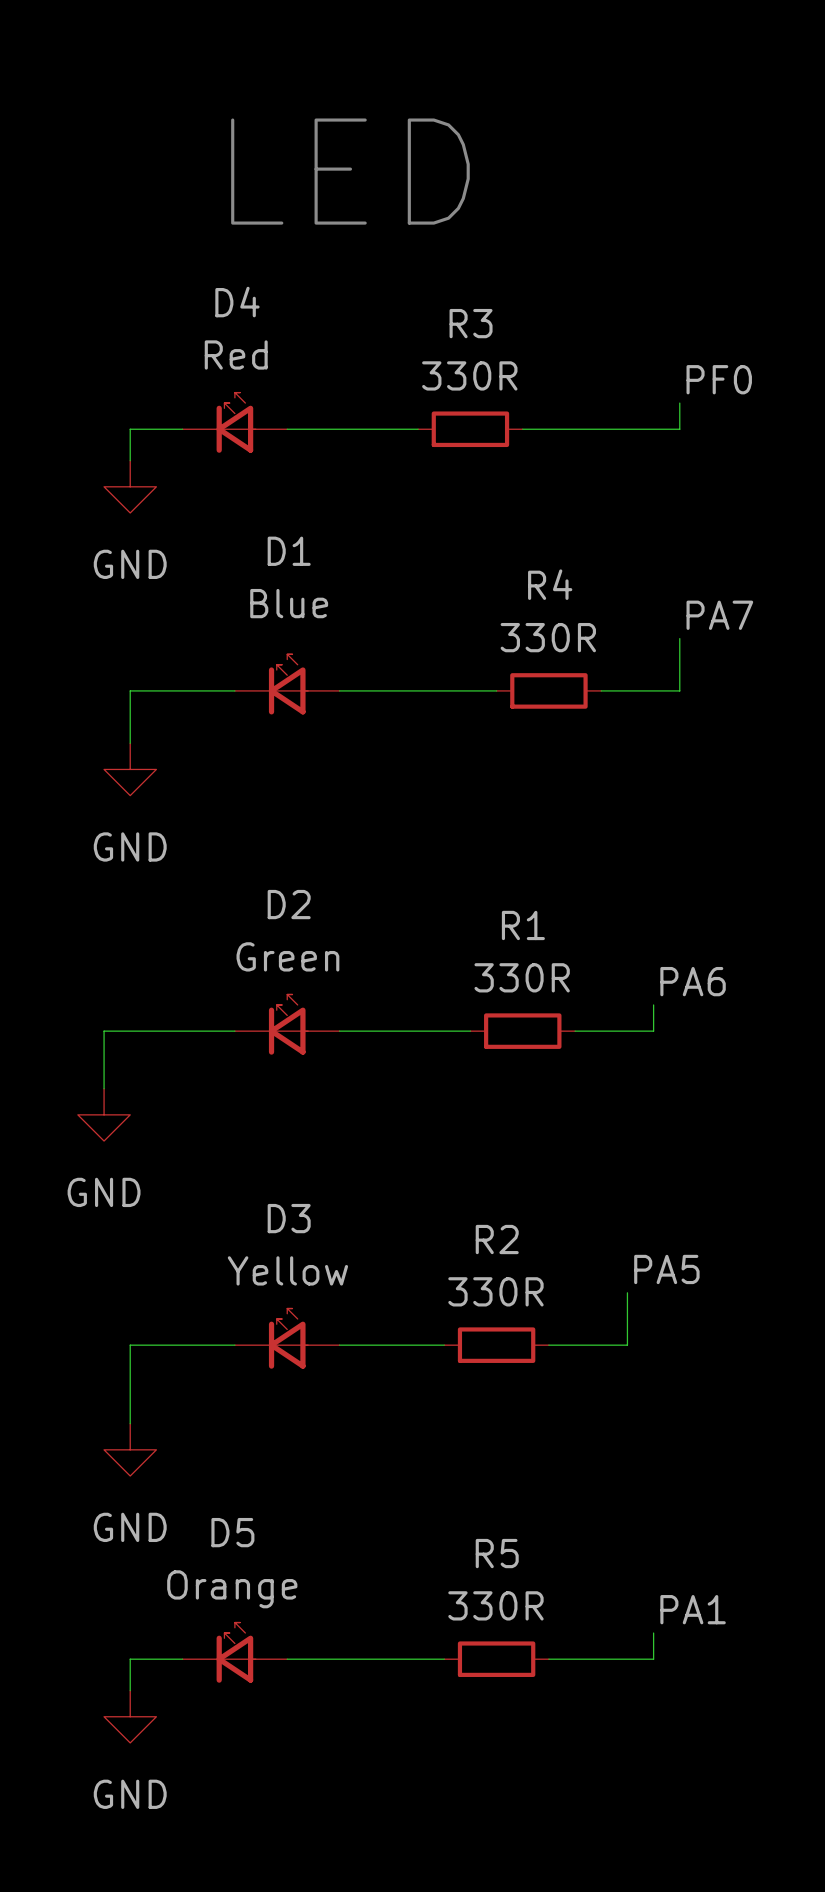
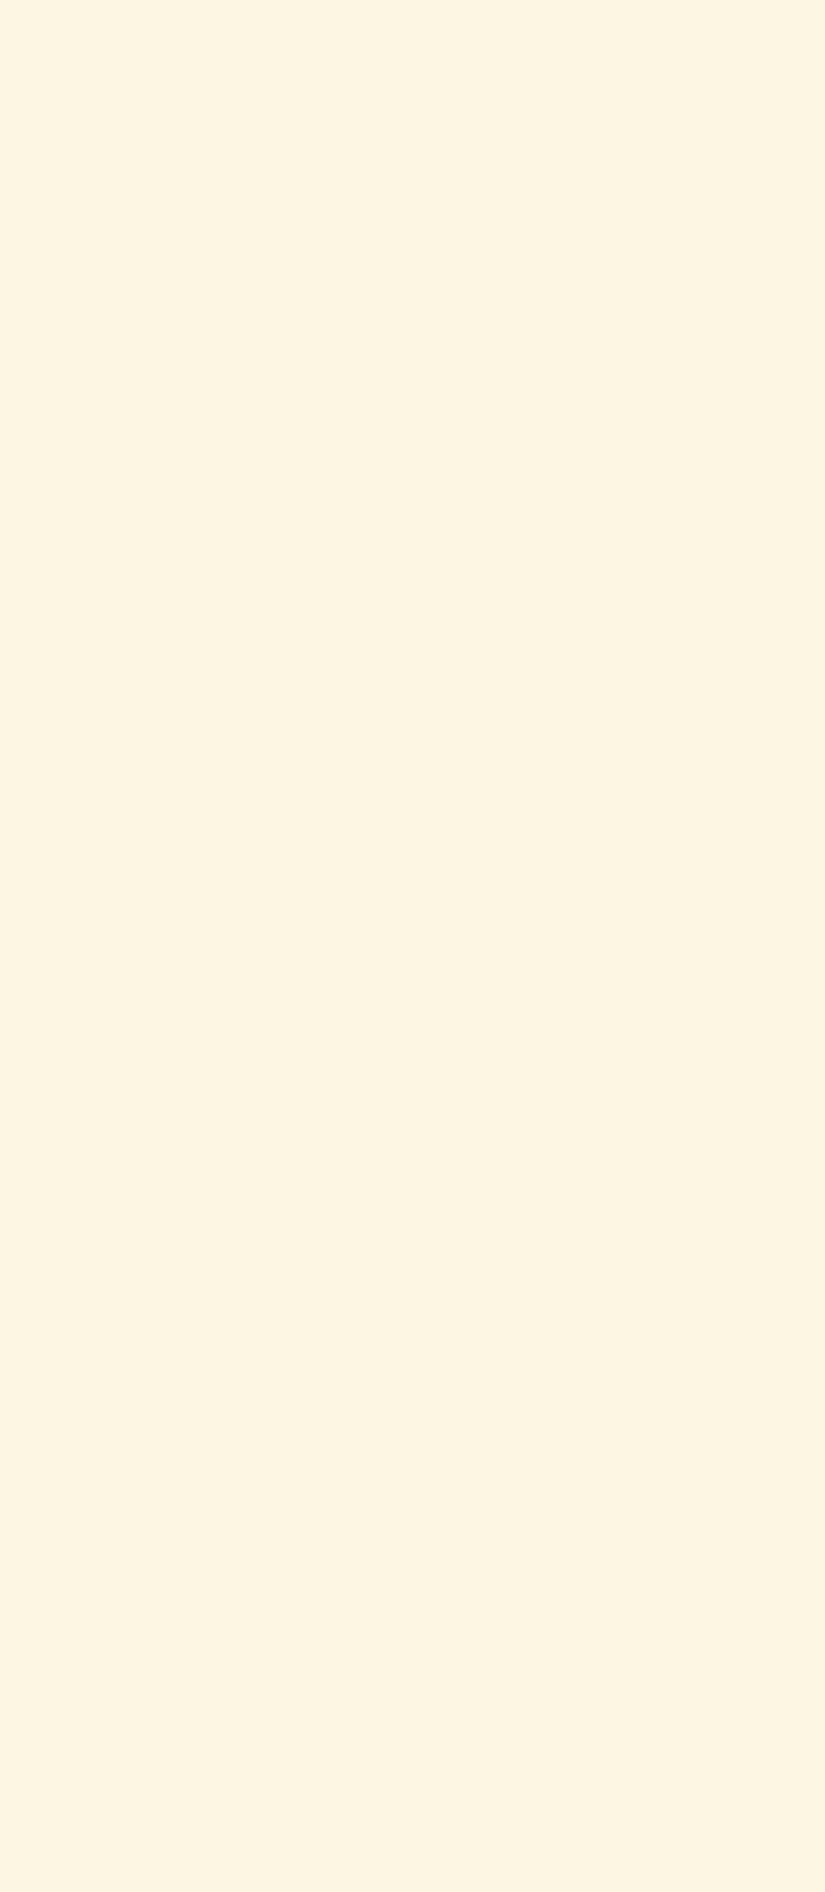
text: LED (350, 171) -> none
label: PF0 (719, 379) -> none
wire: (679, 403) (679, 429) (522, 429) -> none
D4: Red (234, 422) -> none
wire: (182, 429) (130, 429) (130, 460) -> none
wire: (287, 429) (418, 429) -> none
R3: 330R (470, 429) -> none
power symbol: GND (130, 486) -> none
label: PA7 (719, 615) -> none
wire: (679, 638) (679, 690) (601, 690) -> none
D1: Blue (287, 684) -> none
wire: (234, 690) (130, 690) (130, 743) -> none
wire: (339, 690) (496, 690) -> none
R4: 330R (548, 690) -> none
power symbol: GND (130, 769) -> none
label: PA6 (693, 981) -> none
wire: (653, 1004) (653, 1031) (575, 1031) -> none
D2: Green (287, 1024) -> none
wire: (234, 1031) (104, 1031) (104, 1088) -> none
wire: (339, 1031) (470, 1031) -> none
R1: 330R (522, 1031) -> none
power symbol: GND (104, 1114) -> none
label: PA5 (666, 1269) -> none
wire: (627, 1292) (627, 1345) (548, 1345) -> none
D3: Yellow (287, 1338) -> none
wire: (234, 1345) (130, 1345) (130, 1423) -> none
wire: (339, 1345) (444, 1345) -> none
R2: 330R (496, 1345) -> none
power symbol: GND (130, 1449) -> none
label: PA1 (693, 1609) -> none
wire: (653, 1633) (653, 1659) (548, 1659) -> none
D5: Orange (234, 1652) -> none
wire: (182, 1659) (130, 1659) (130, 1690) -> none
wire: (287, 1659) (444, 1659) -> none
R5: 330R (496, 1659) -> none
power symbol: GND (130, 1716) -> none

